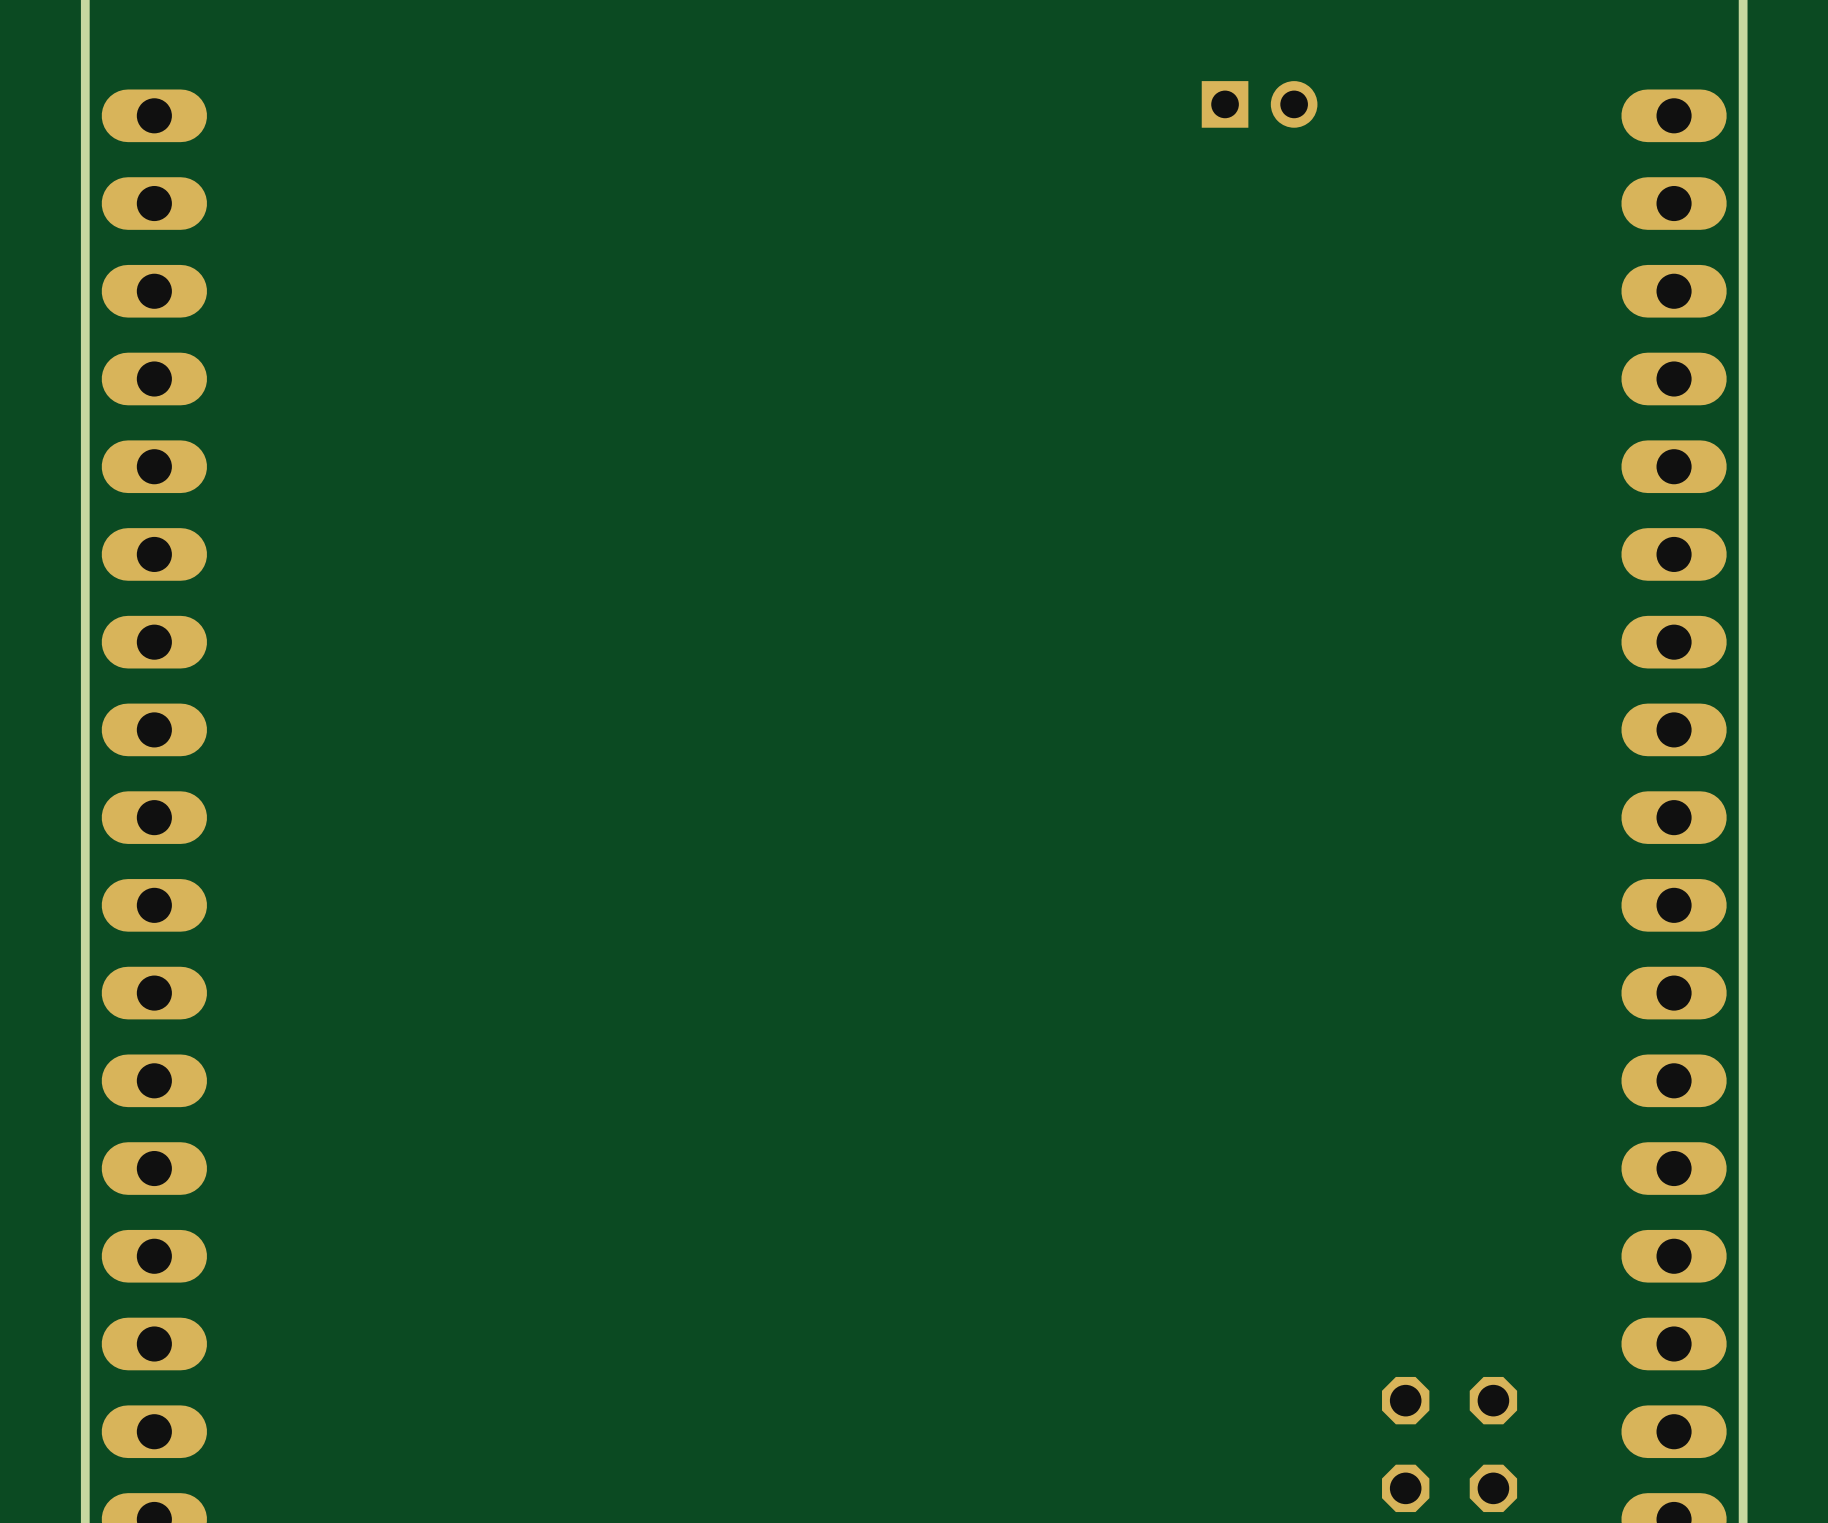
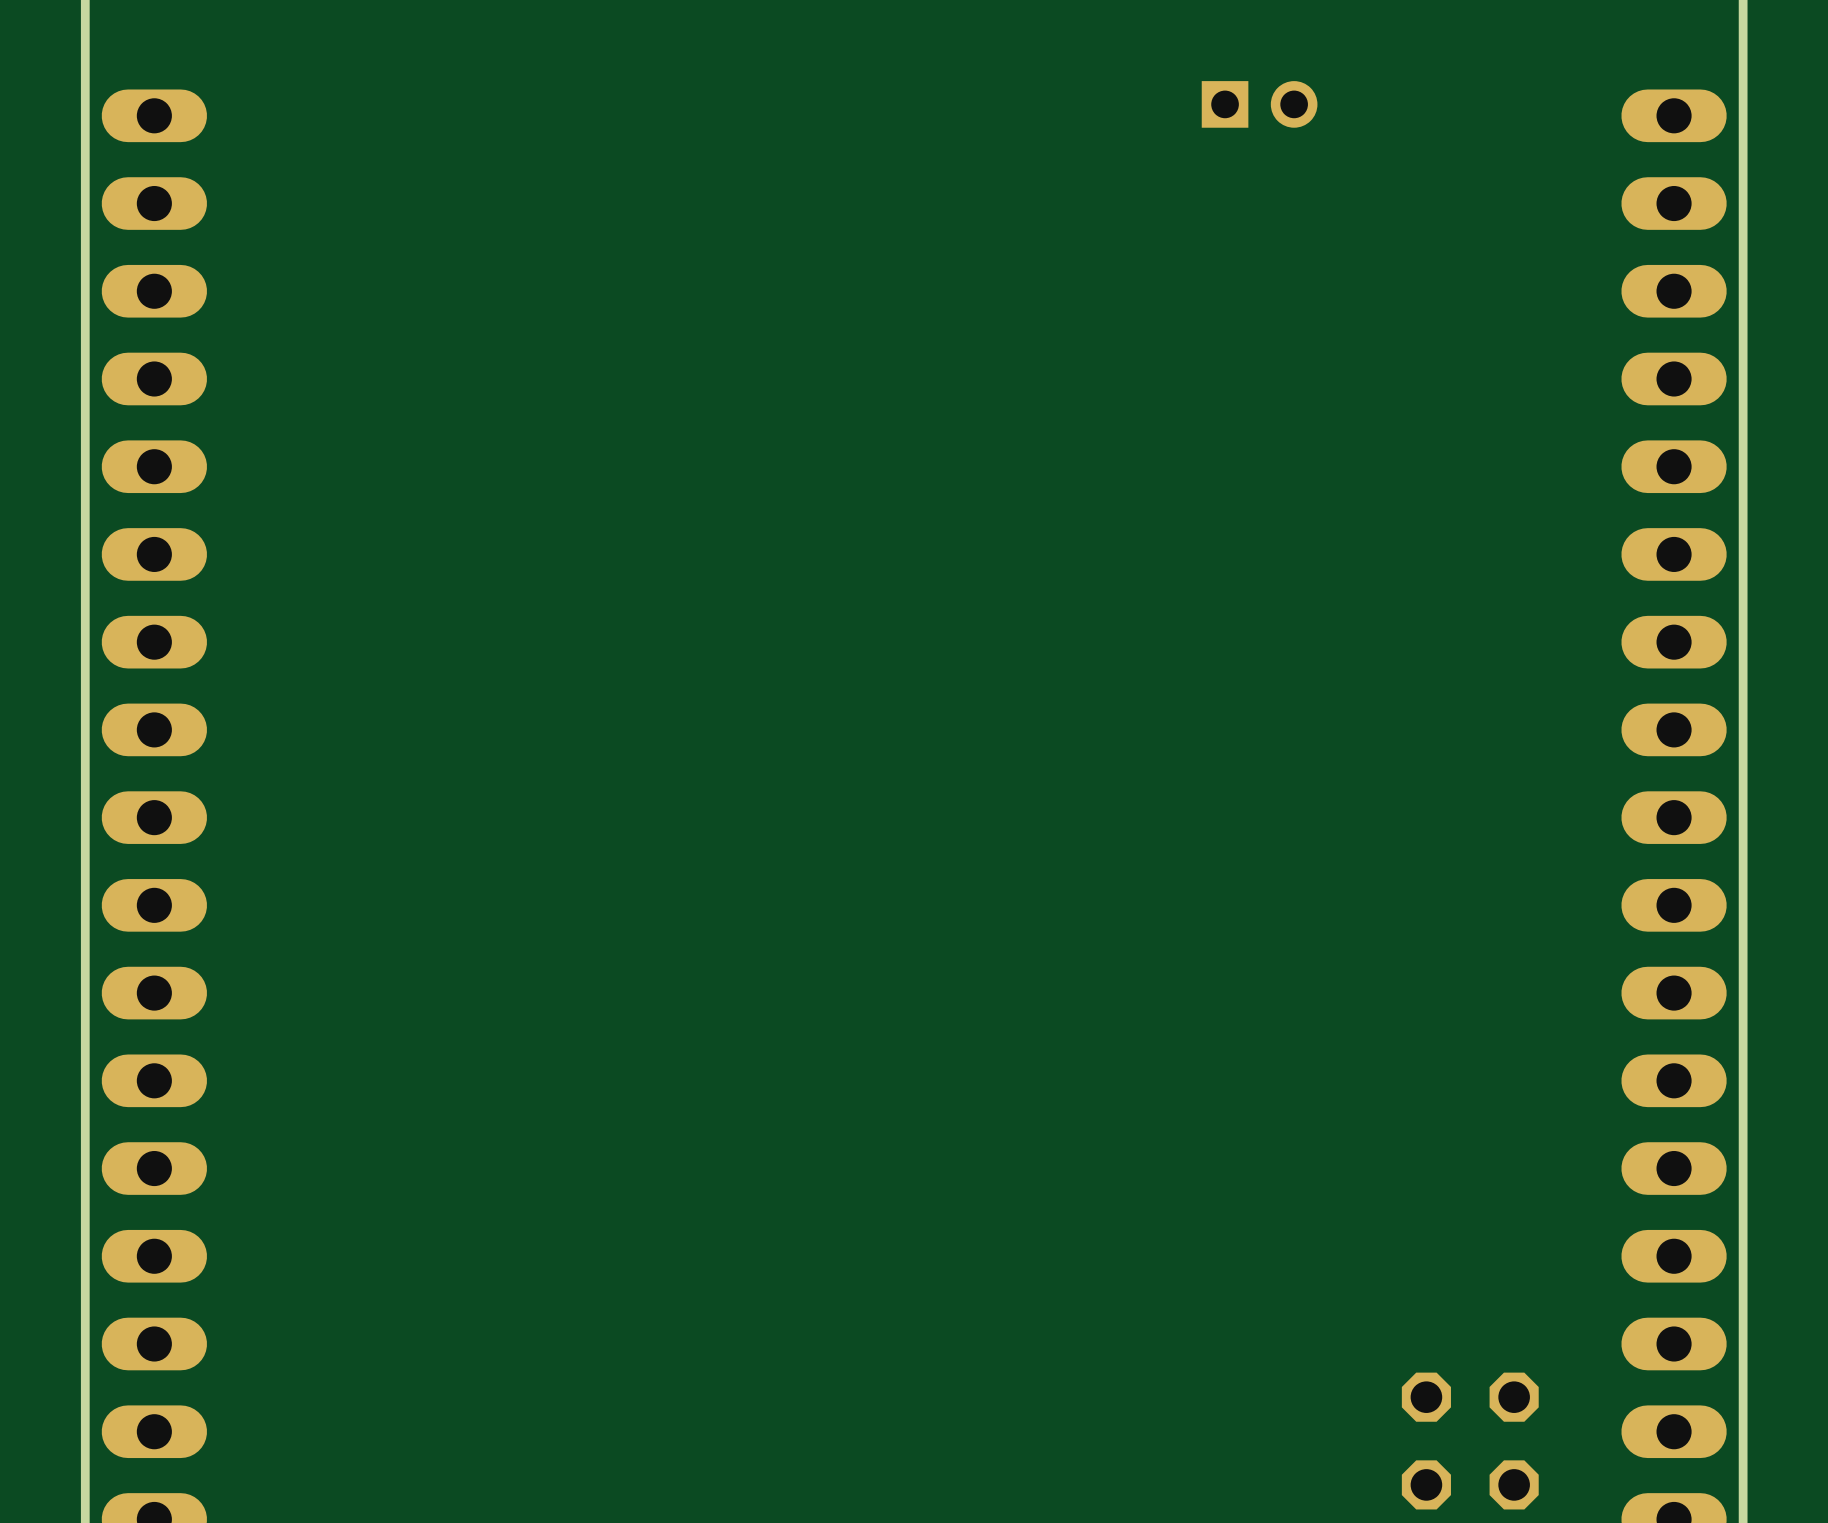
part footprint: [1382, 1376, 1518, 1513] -> [1401, 1372, 1539, 1510]

